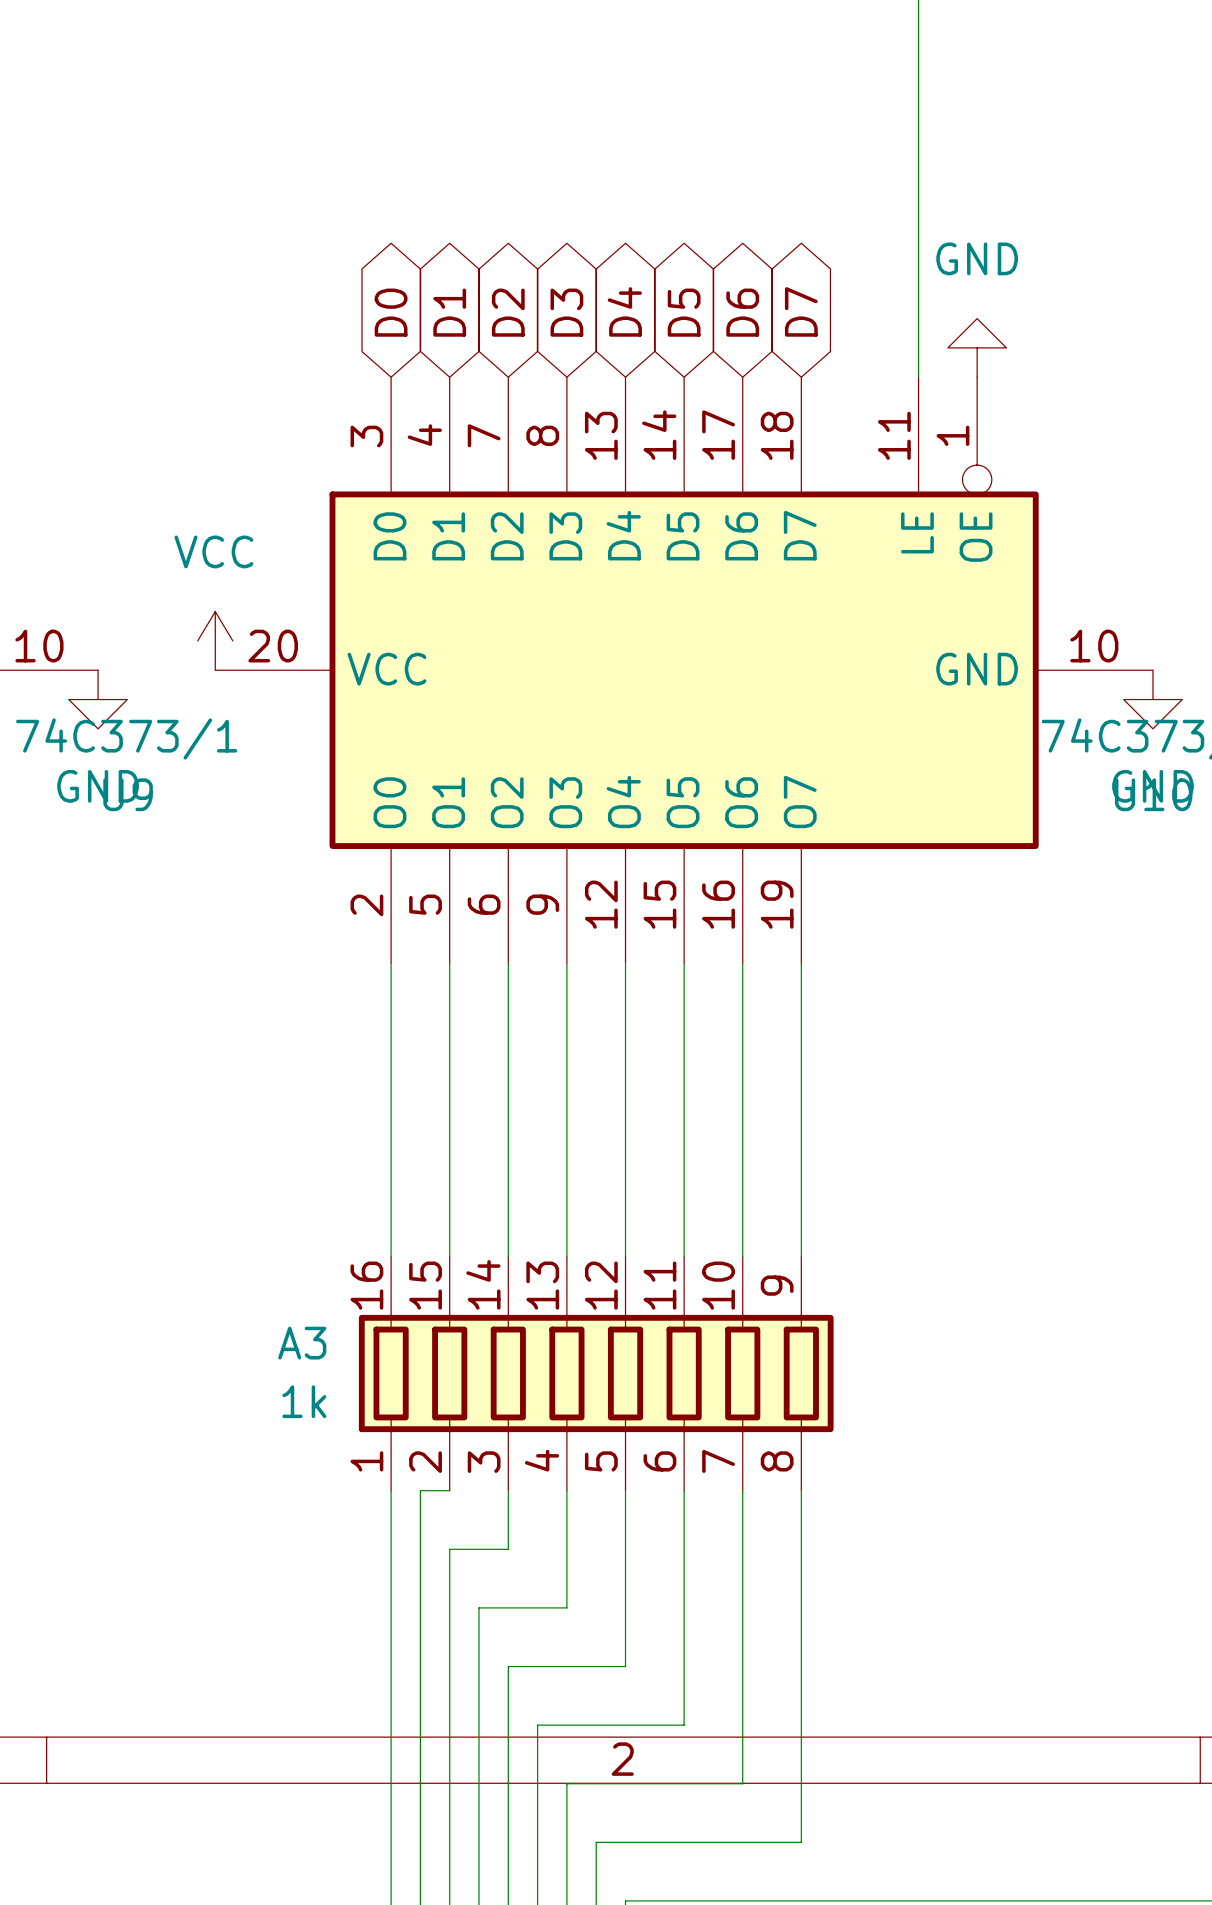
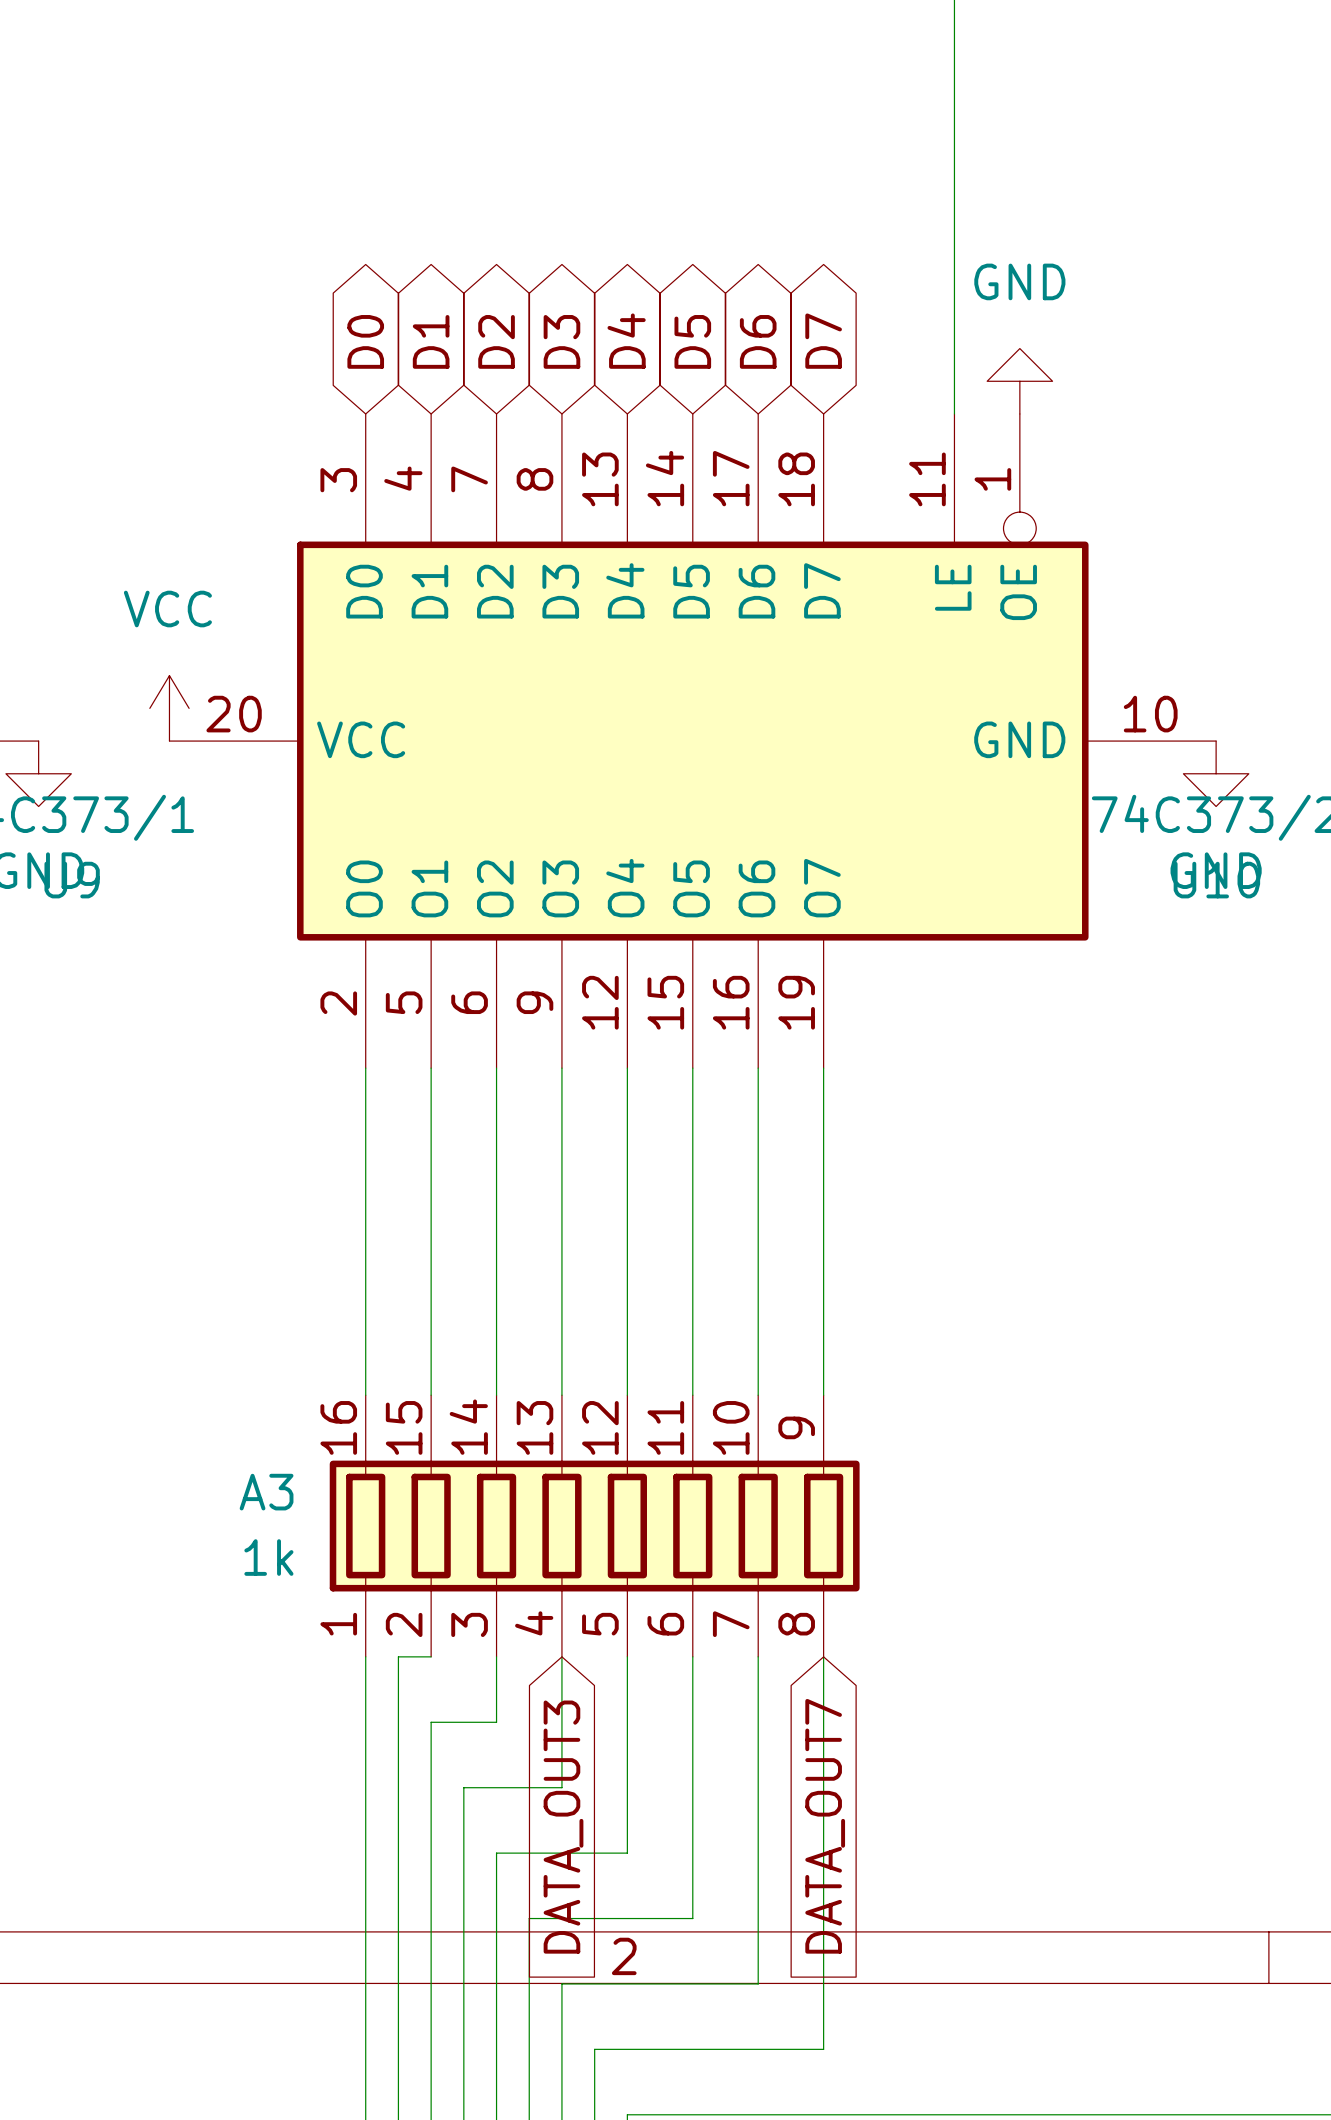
global label: none -> DATA_OUT7 (825, 1826)
global label: none -> DATA_OUT3 (563, 1827)

